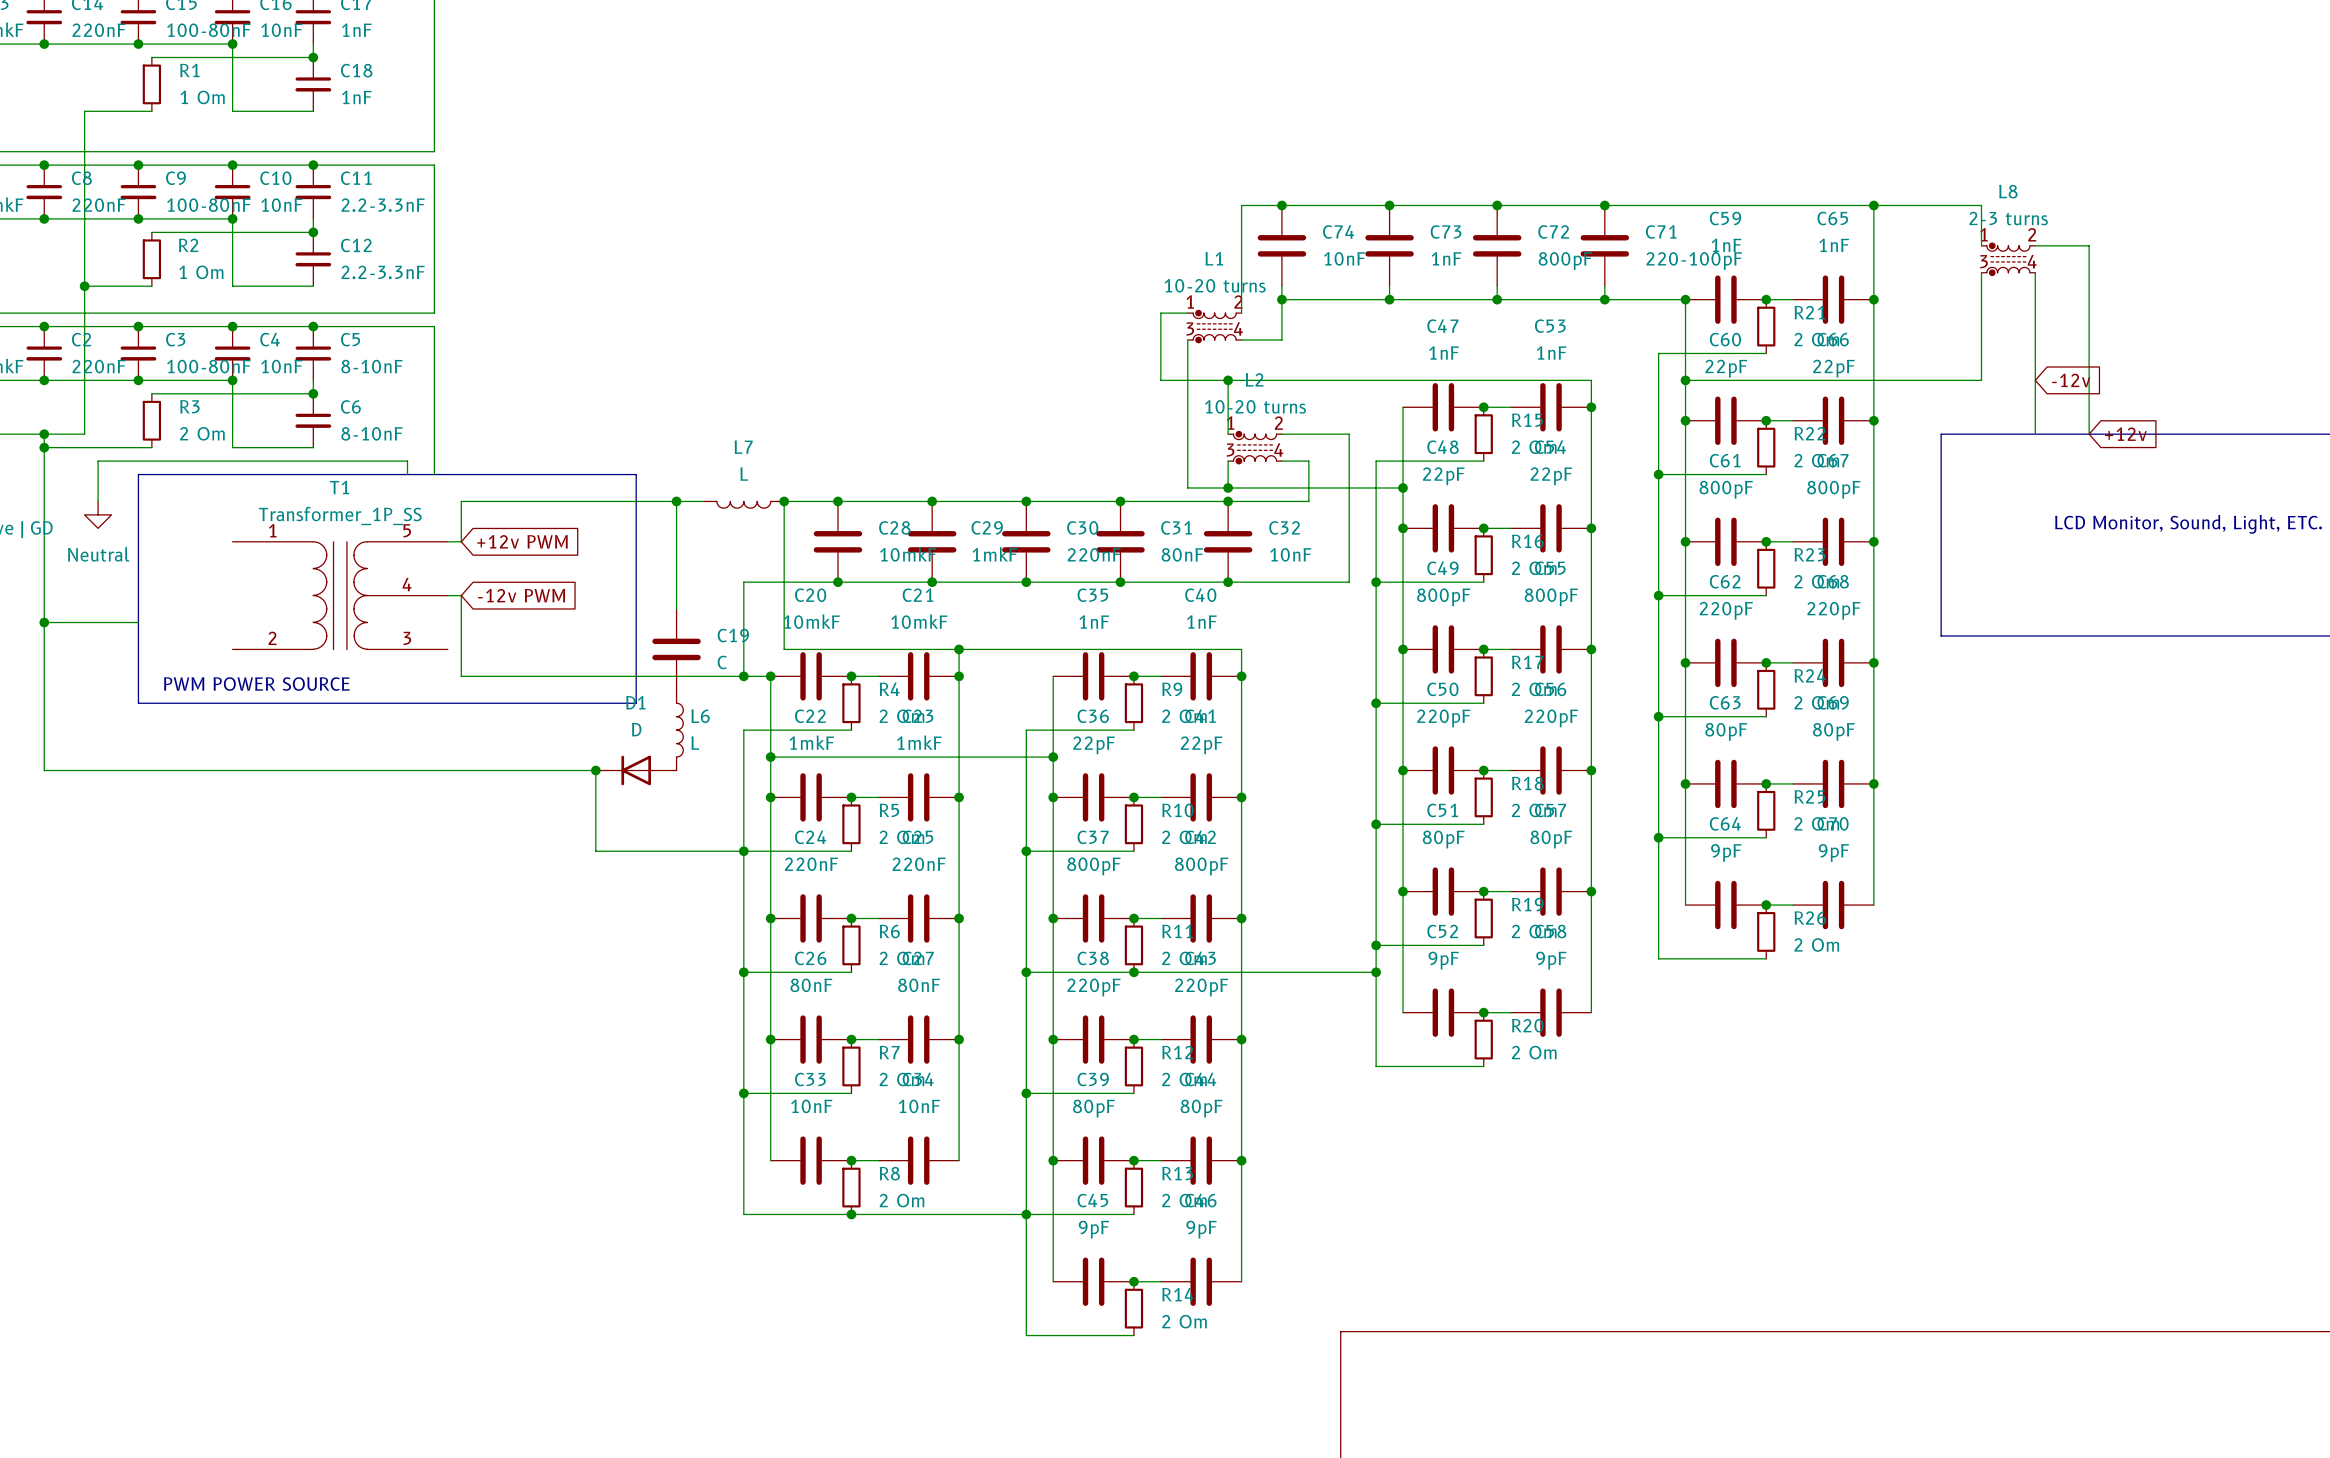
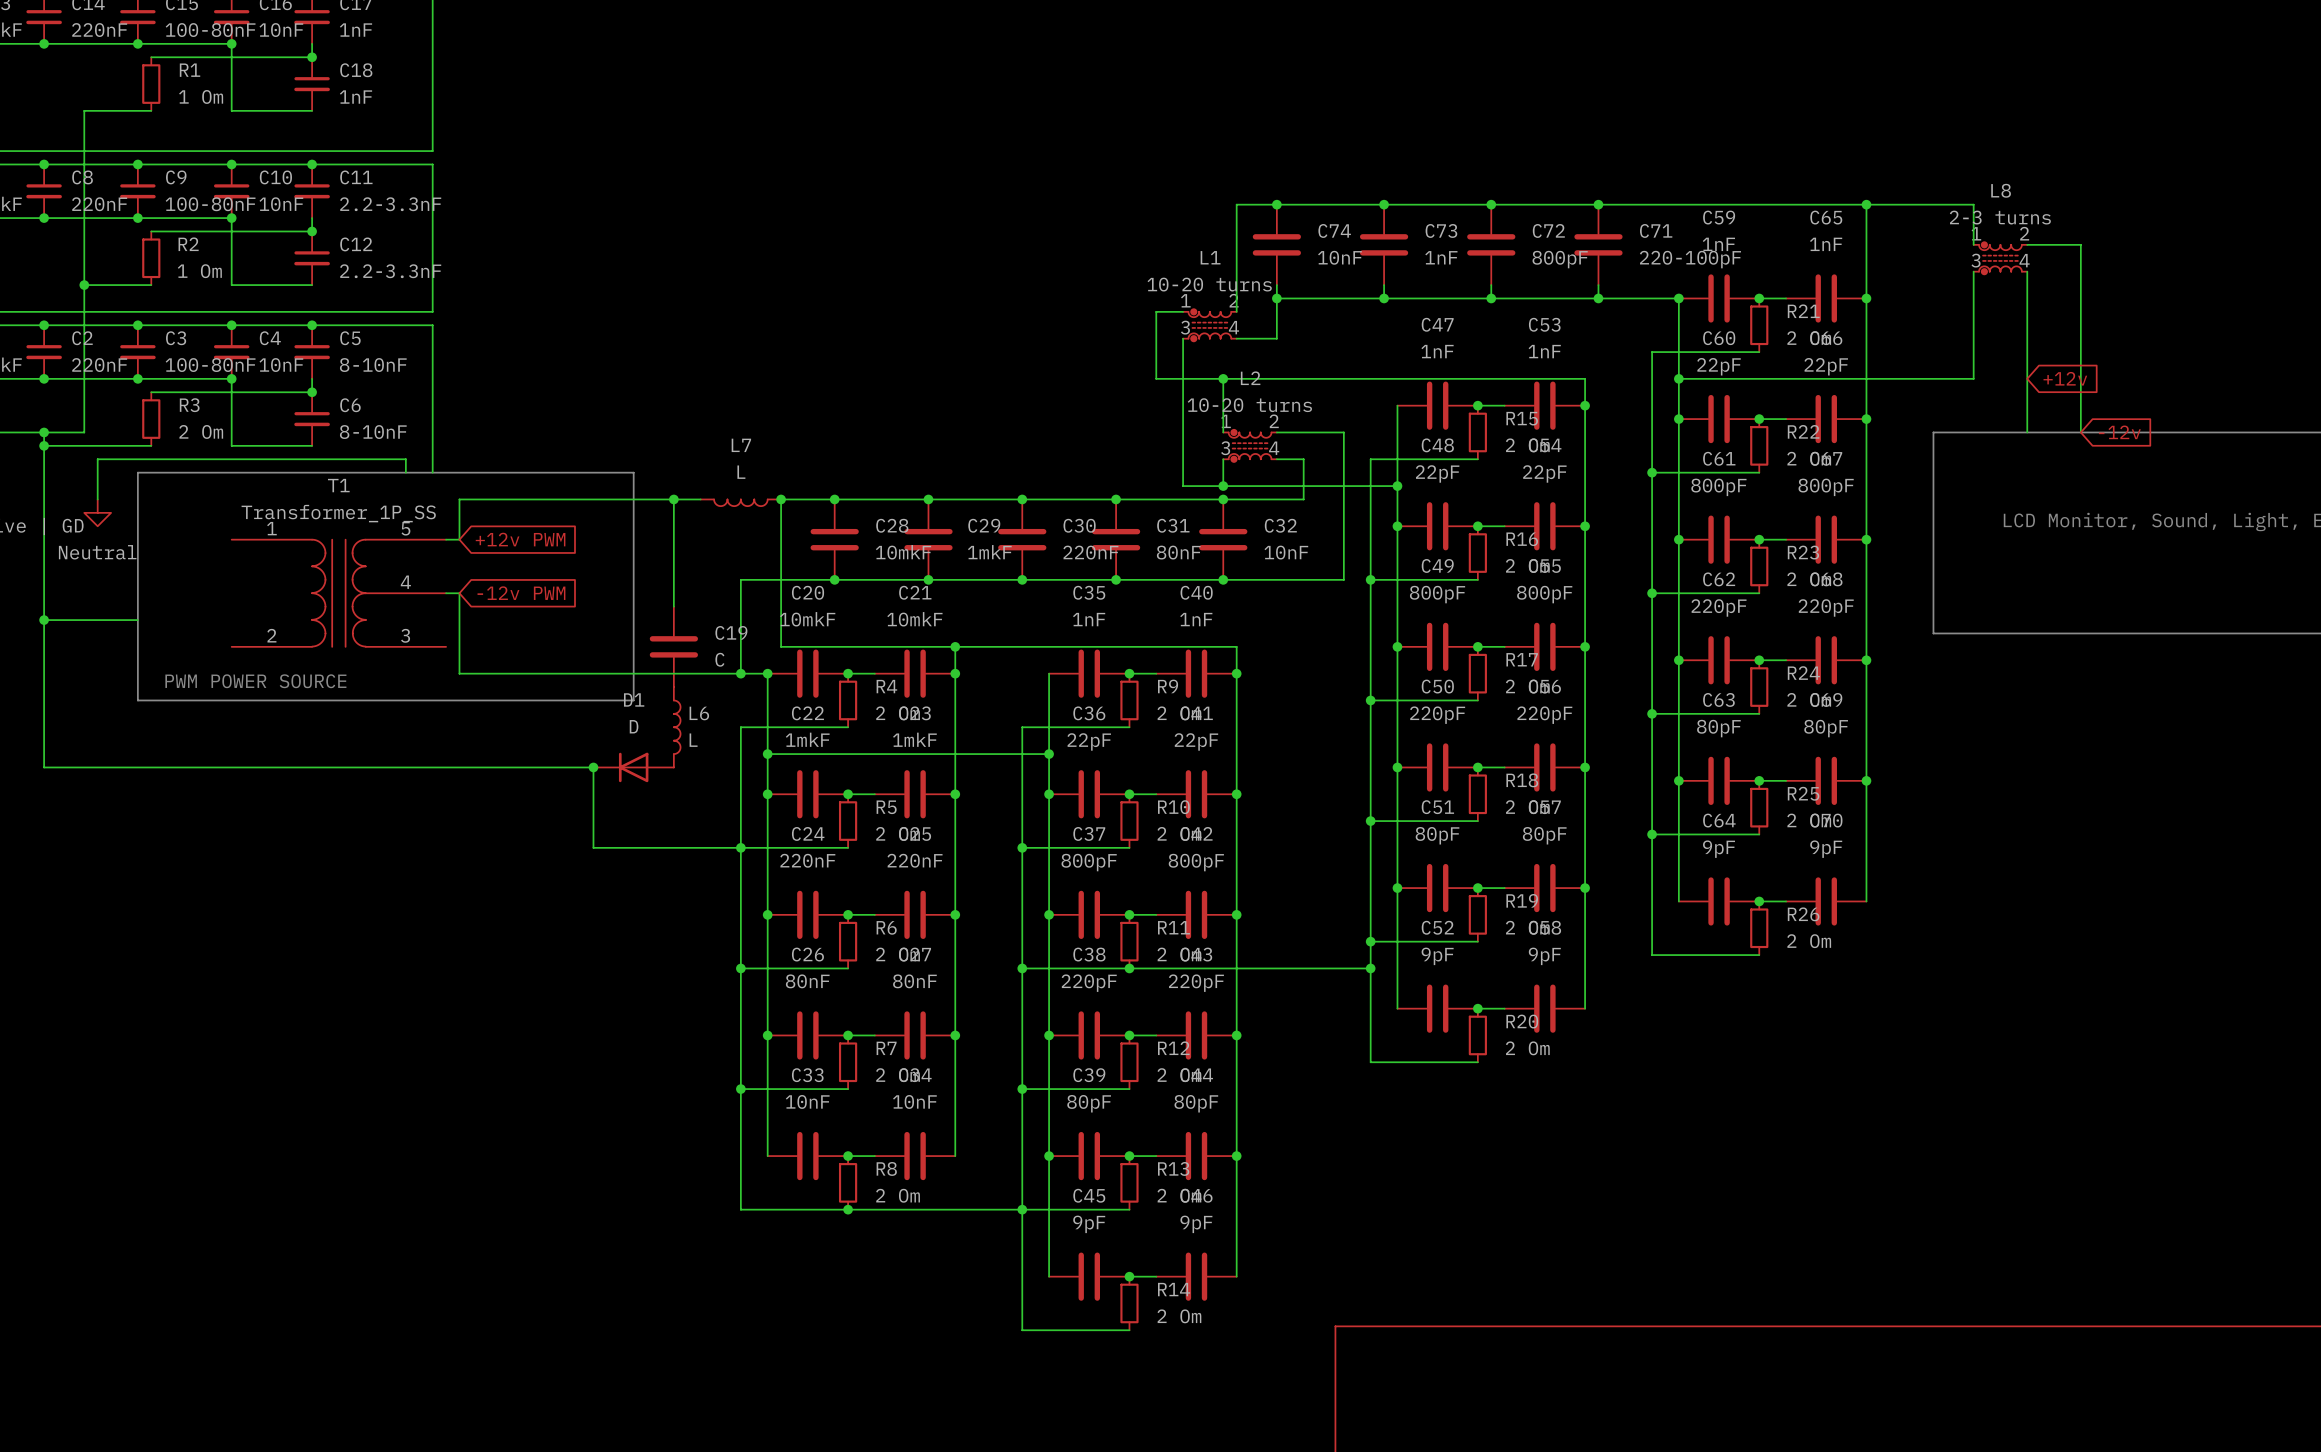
global label: -12v (2071, 380) -> +12v (2065, 378)
global label: +12v (2125, 434) -> -12v (2119, 432)

